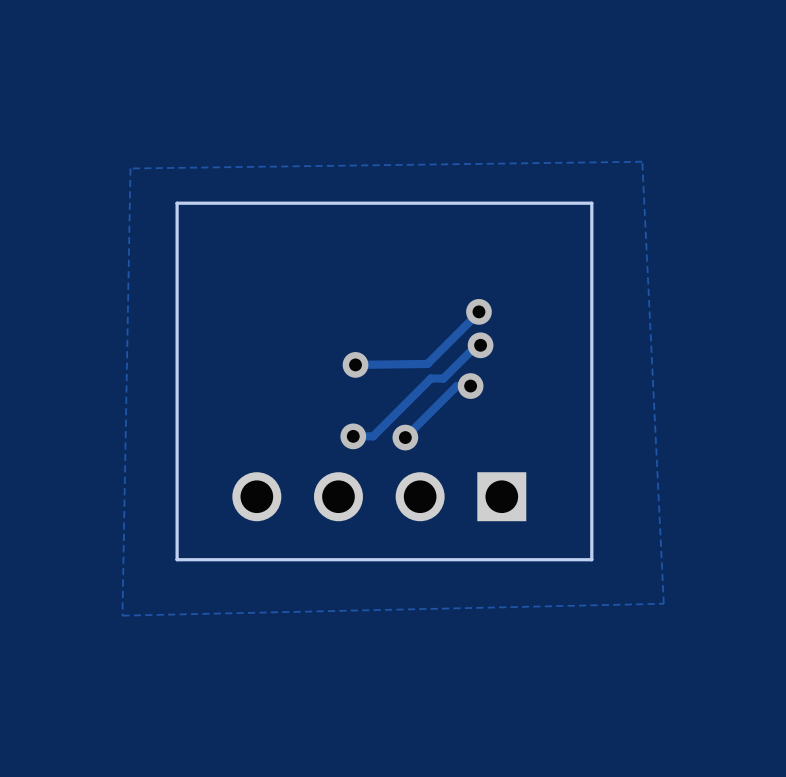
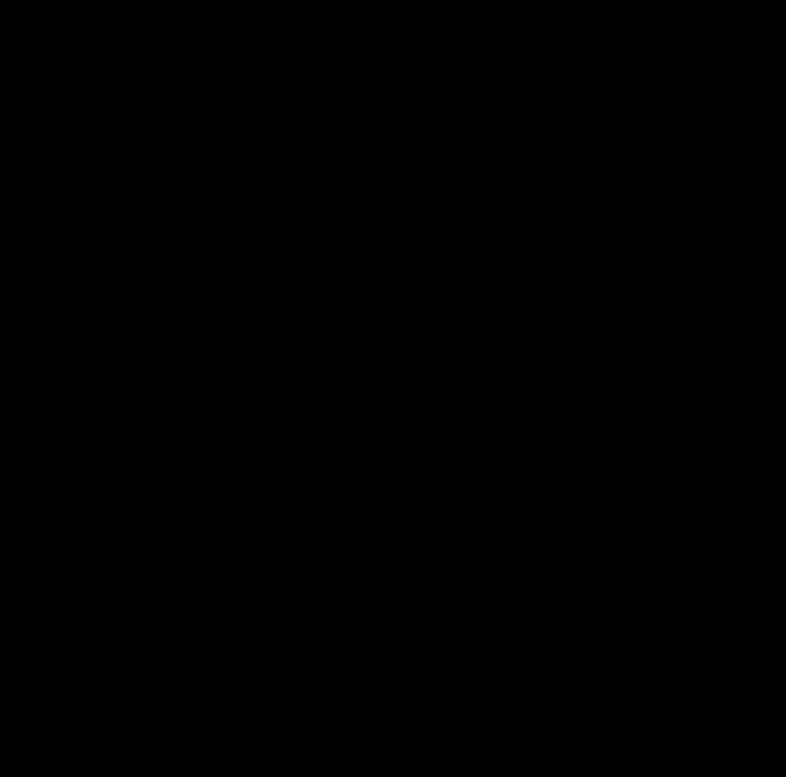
zone outline: (642, 161) (130, 168) (122, 615) (663, 603) (642, 161) -> none
board edge: (591, 203) (177, 203) (177, 559) (591, 559) (591, 203) -> none
via: (478, 311) -> none
track: (479, 312) (427, 363) (355, 363) -> none
track: (480, 345) (476, 345) (443, 378) (430, 378) (373, 436) (353, 436) -> none
via: (480, 345) -> none
via: (355, 364) -> none
track: (470, 386) (456, 386) (405, 437) -> none
via: (470, 386) -> none
via: (353, 436) -> none
via: (405, 437) -> none
part: (379, 496) -> none

